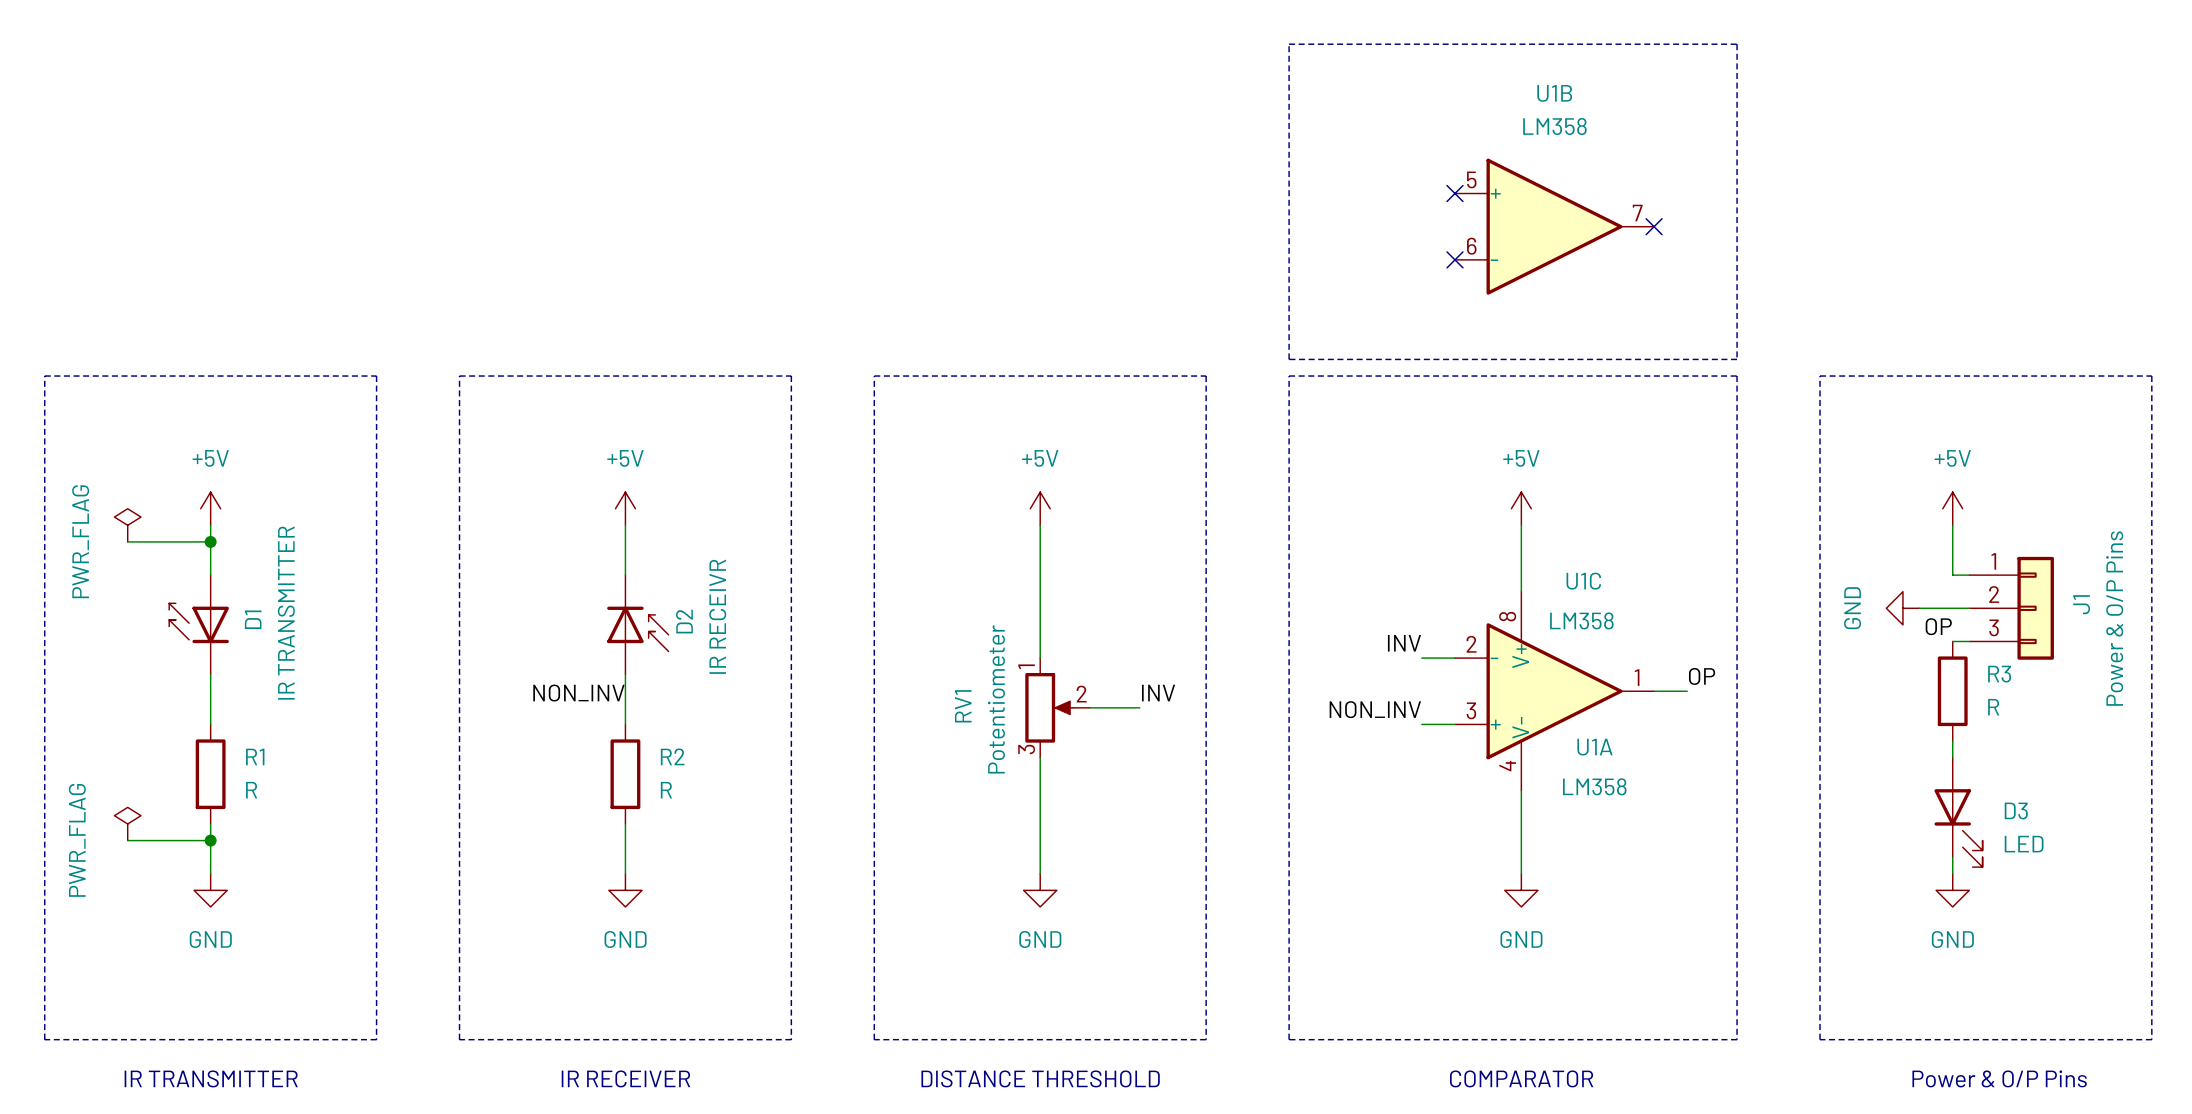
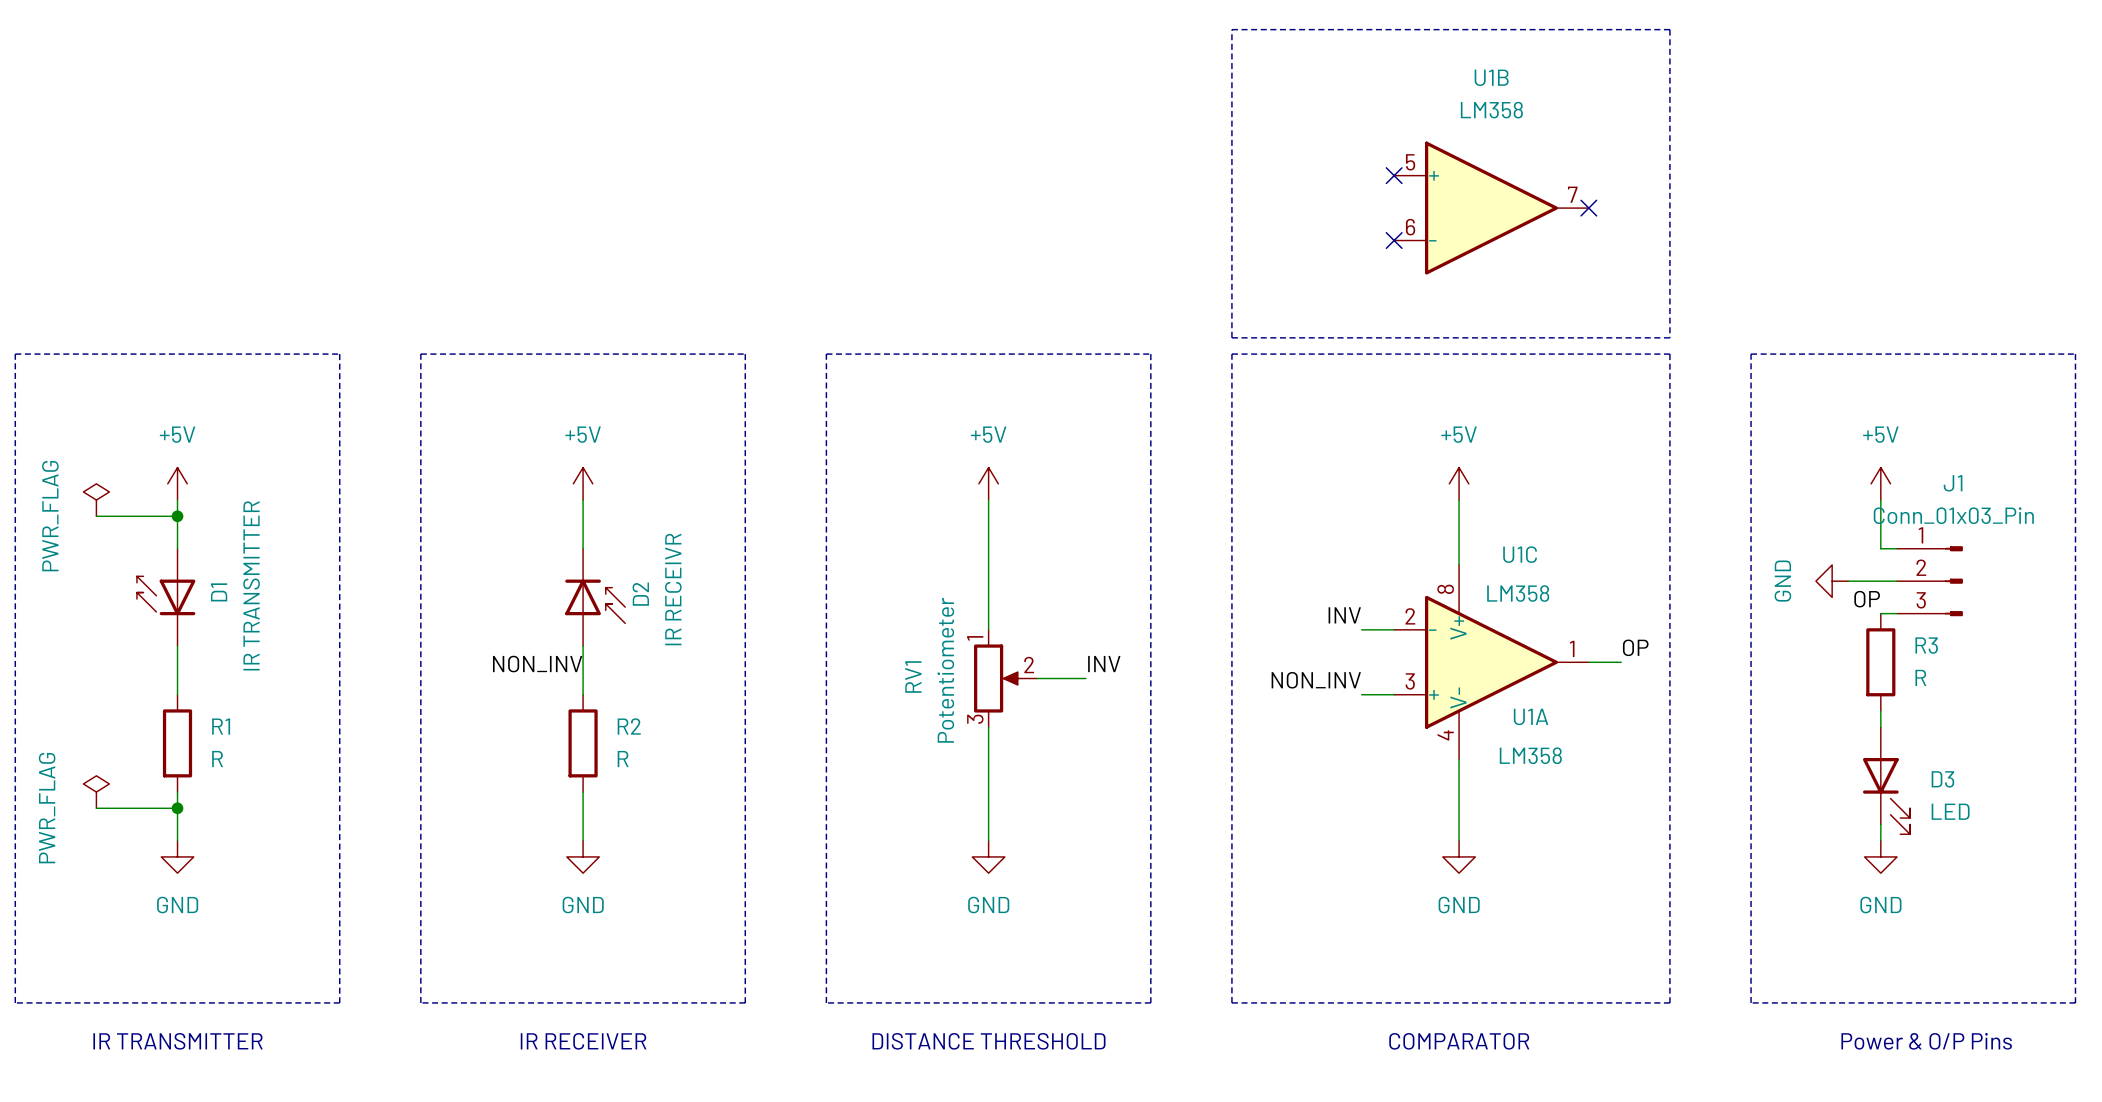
J1 symbol: [1969, 556, 2054, 660] -> [1897, 546, 1963, 617]
J1 name position: J1 (2081, 604) -> J1 (1953, 483)
J1 value: Power & O/P Pins (2114, 618) -> Conn_01x03_Pin (1953, 515)

